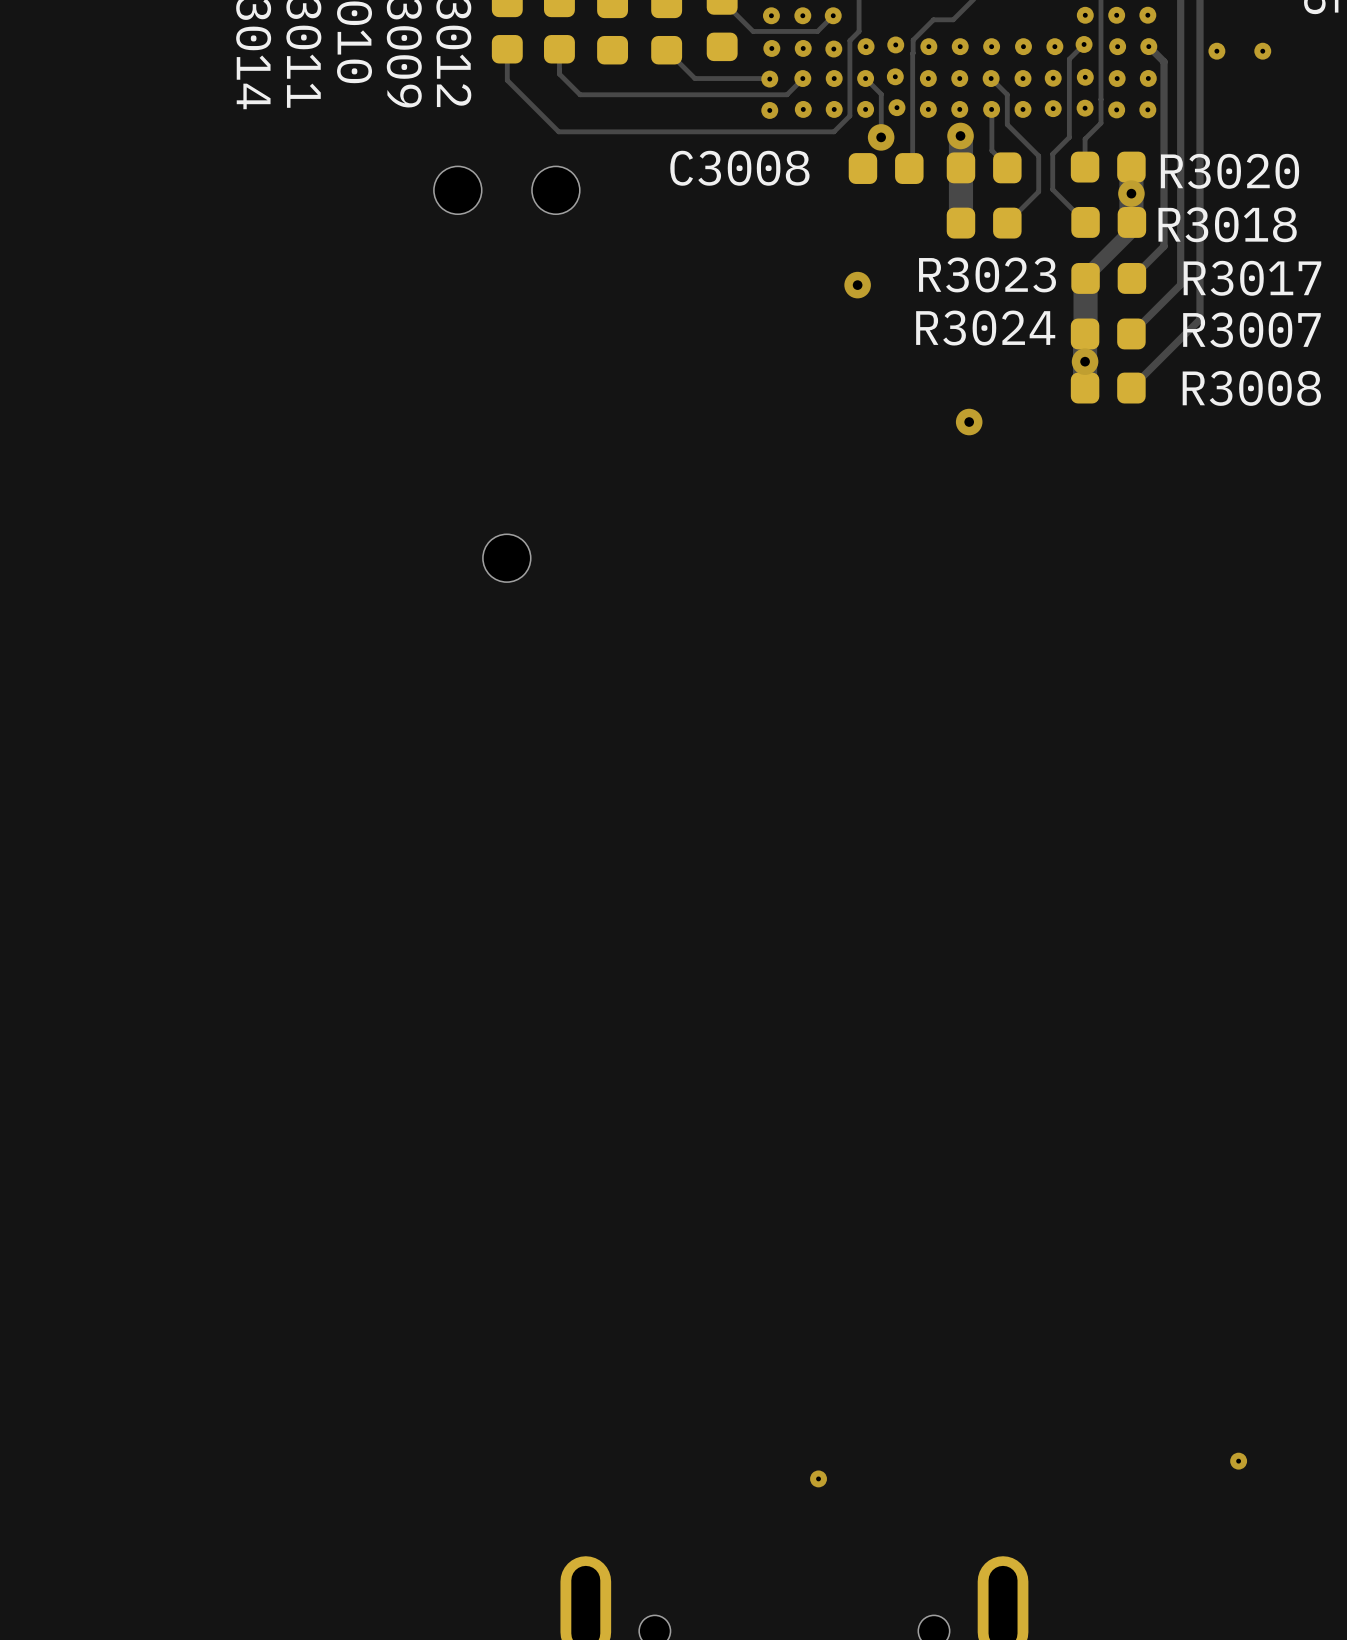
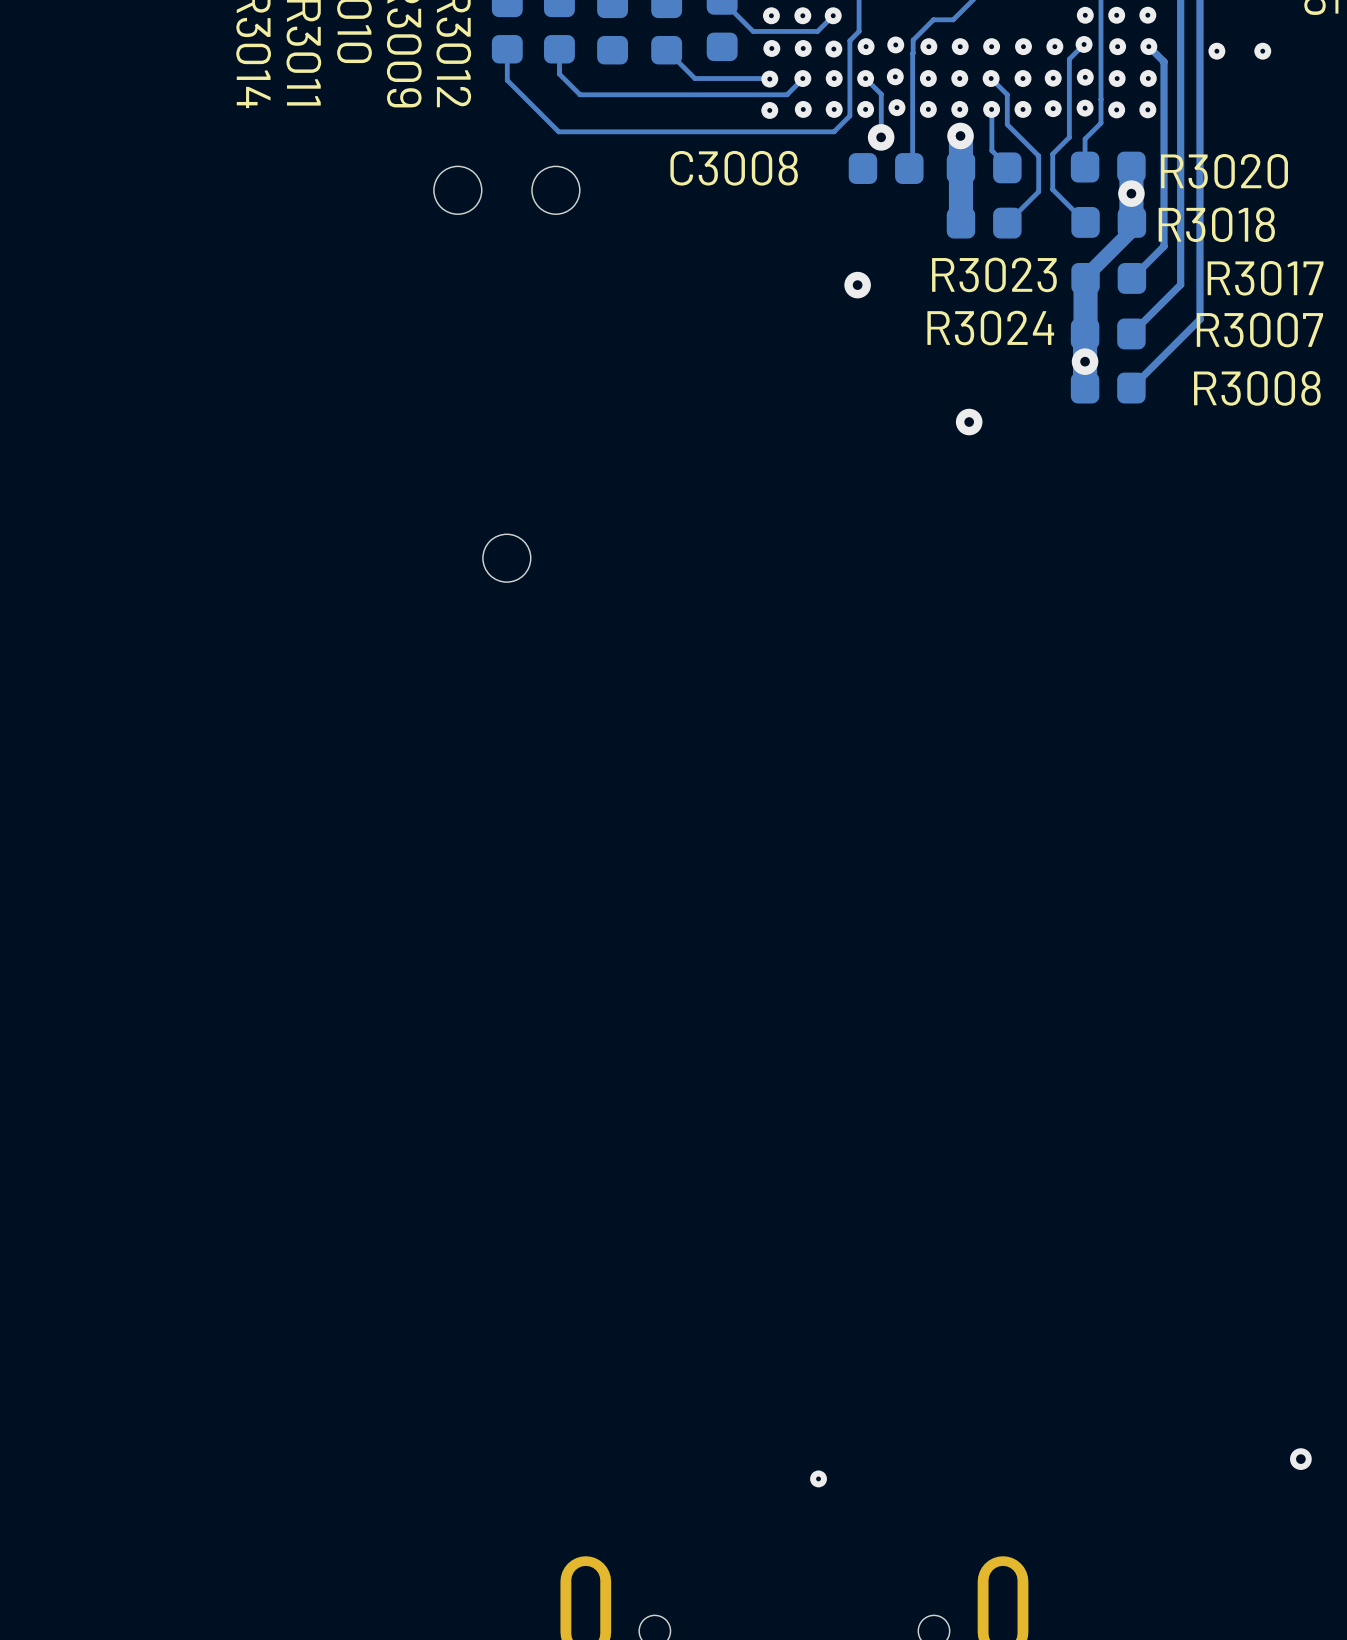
via: none -> (1300, 1459)
via: (1238, 1461) -> none

